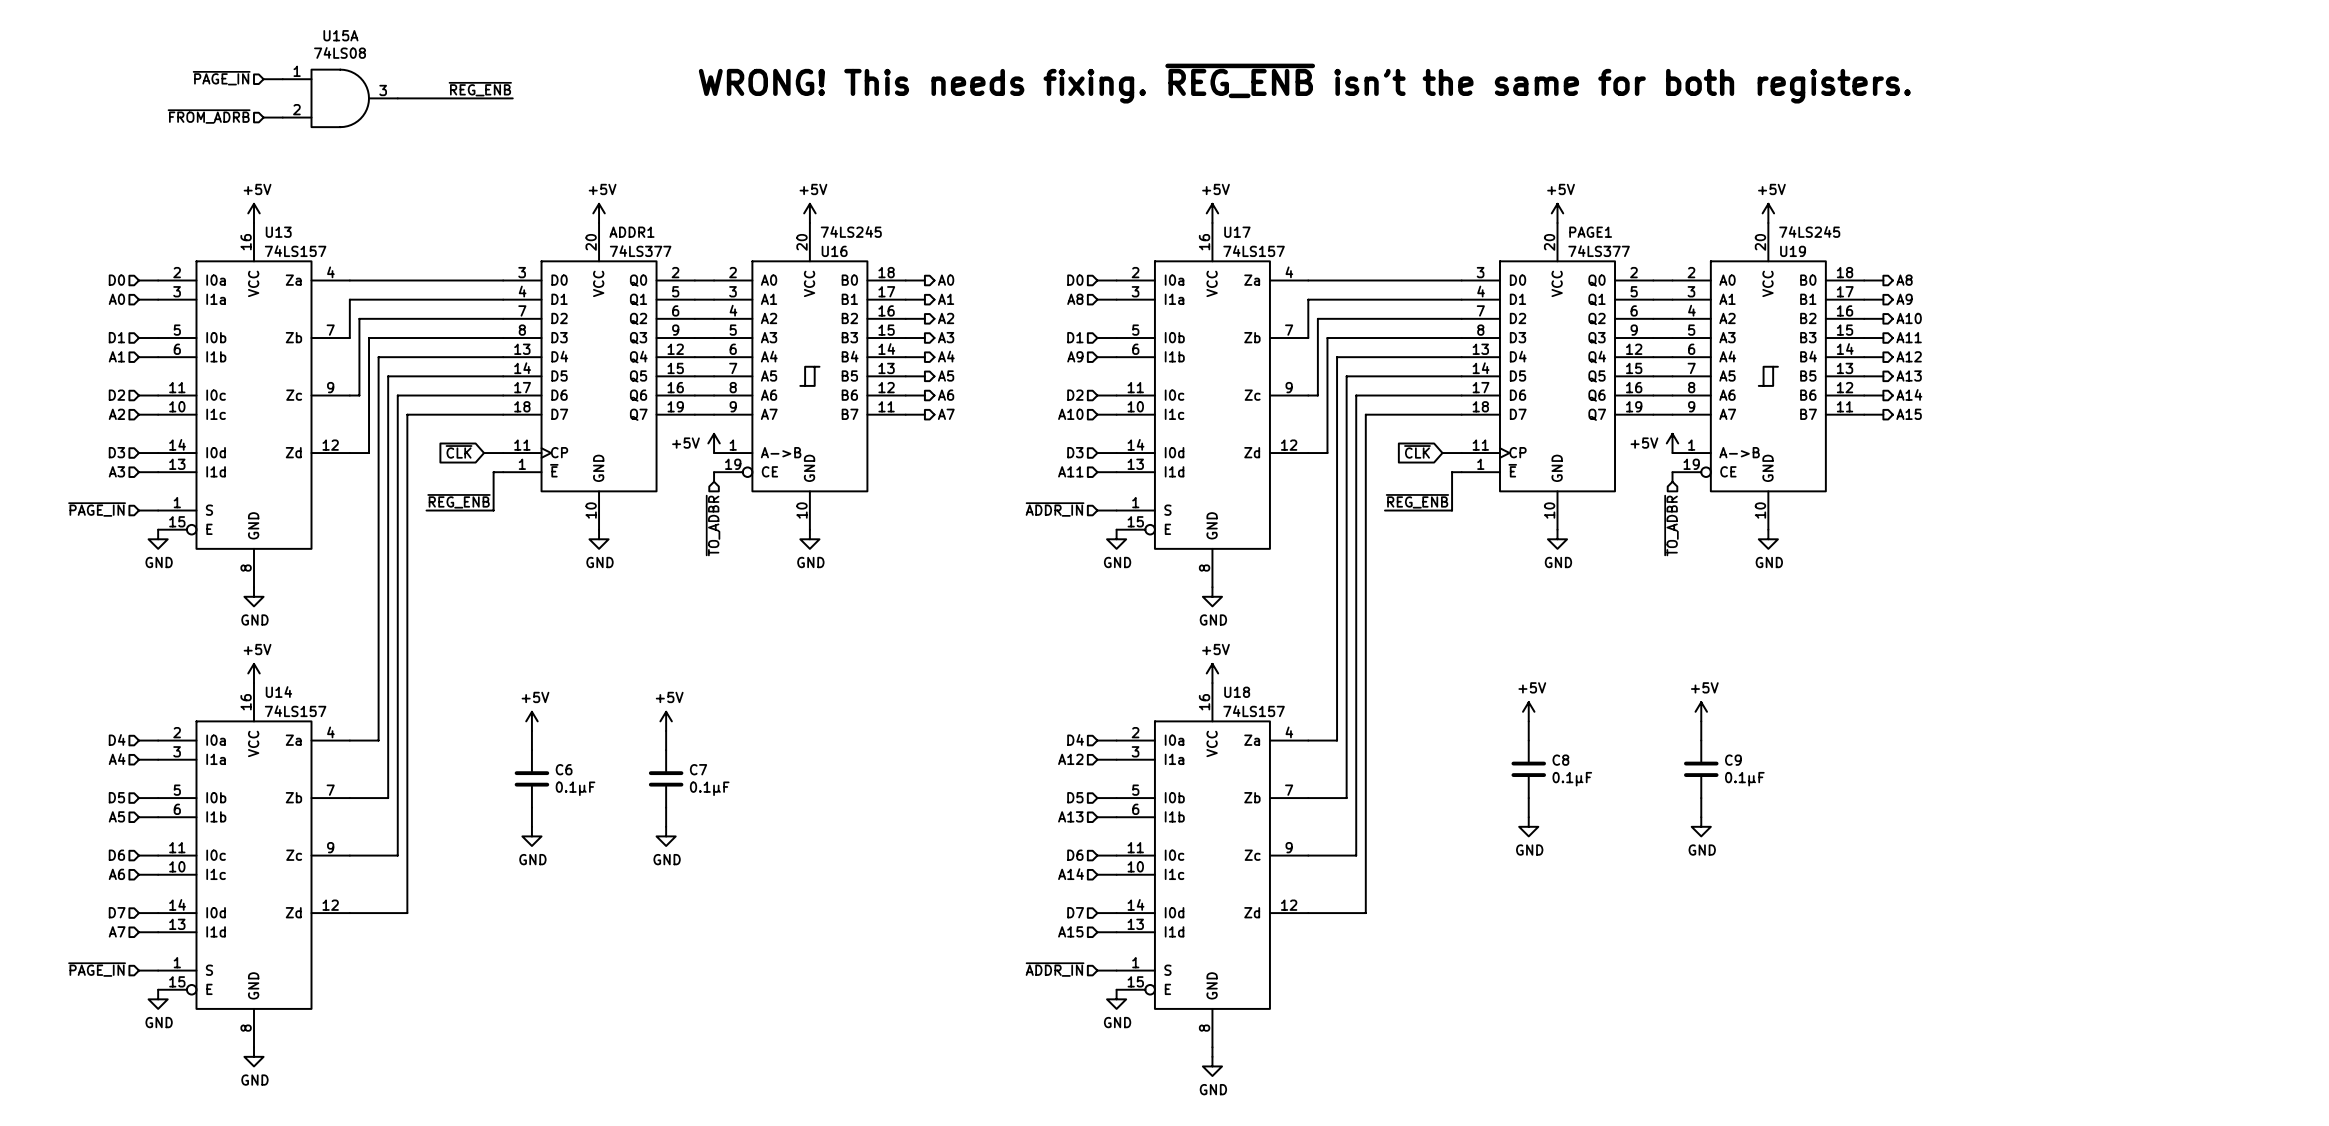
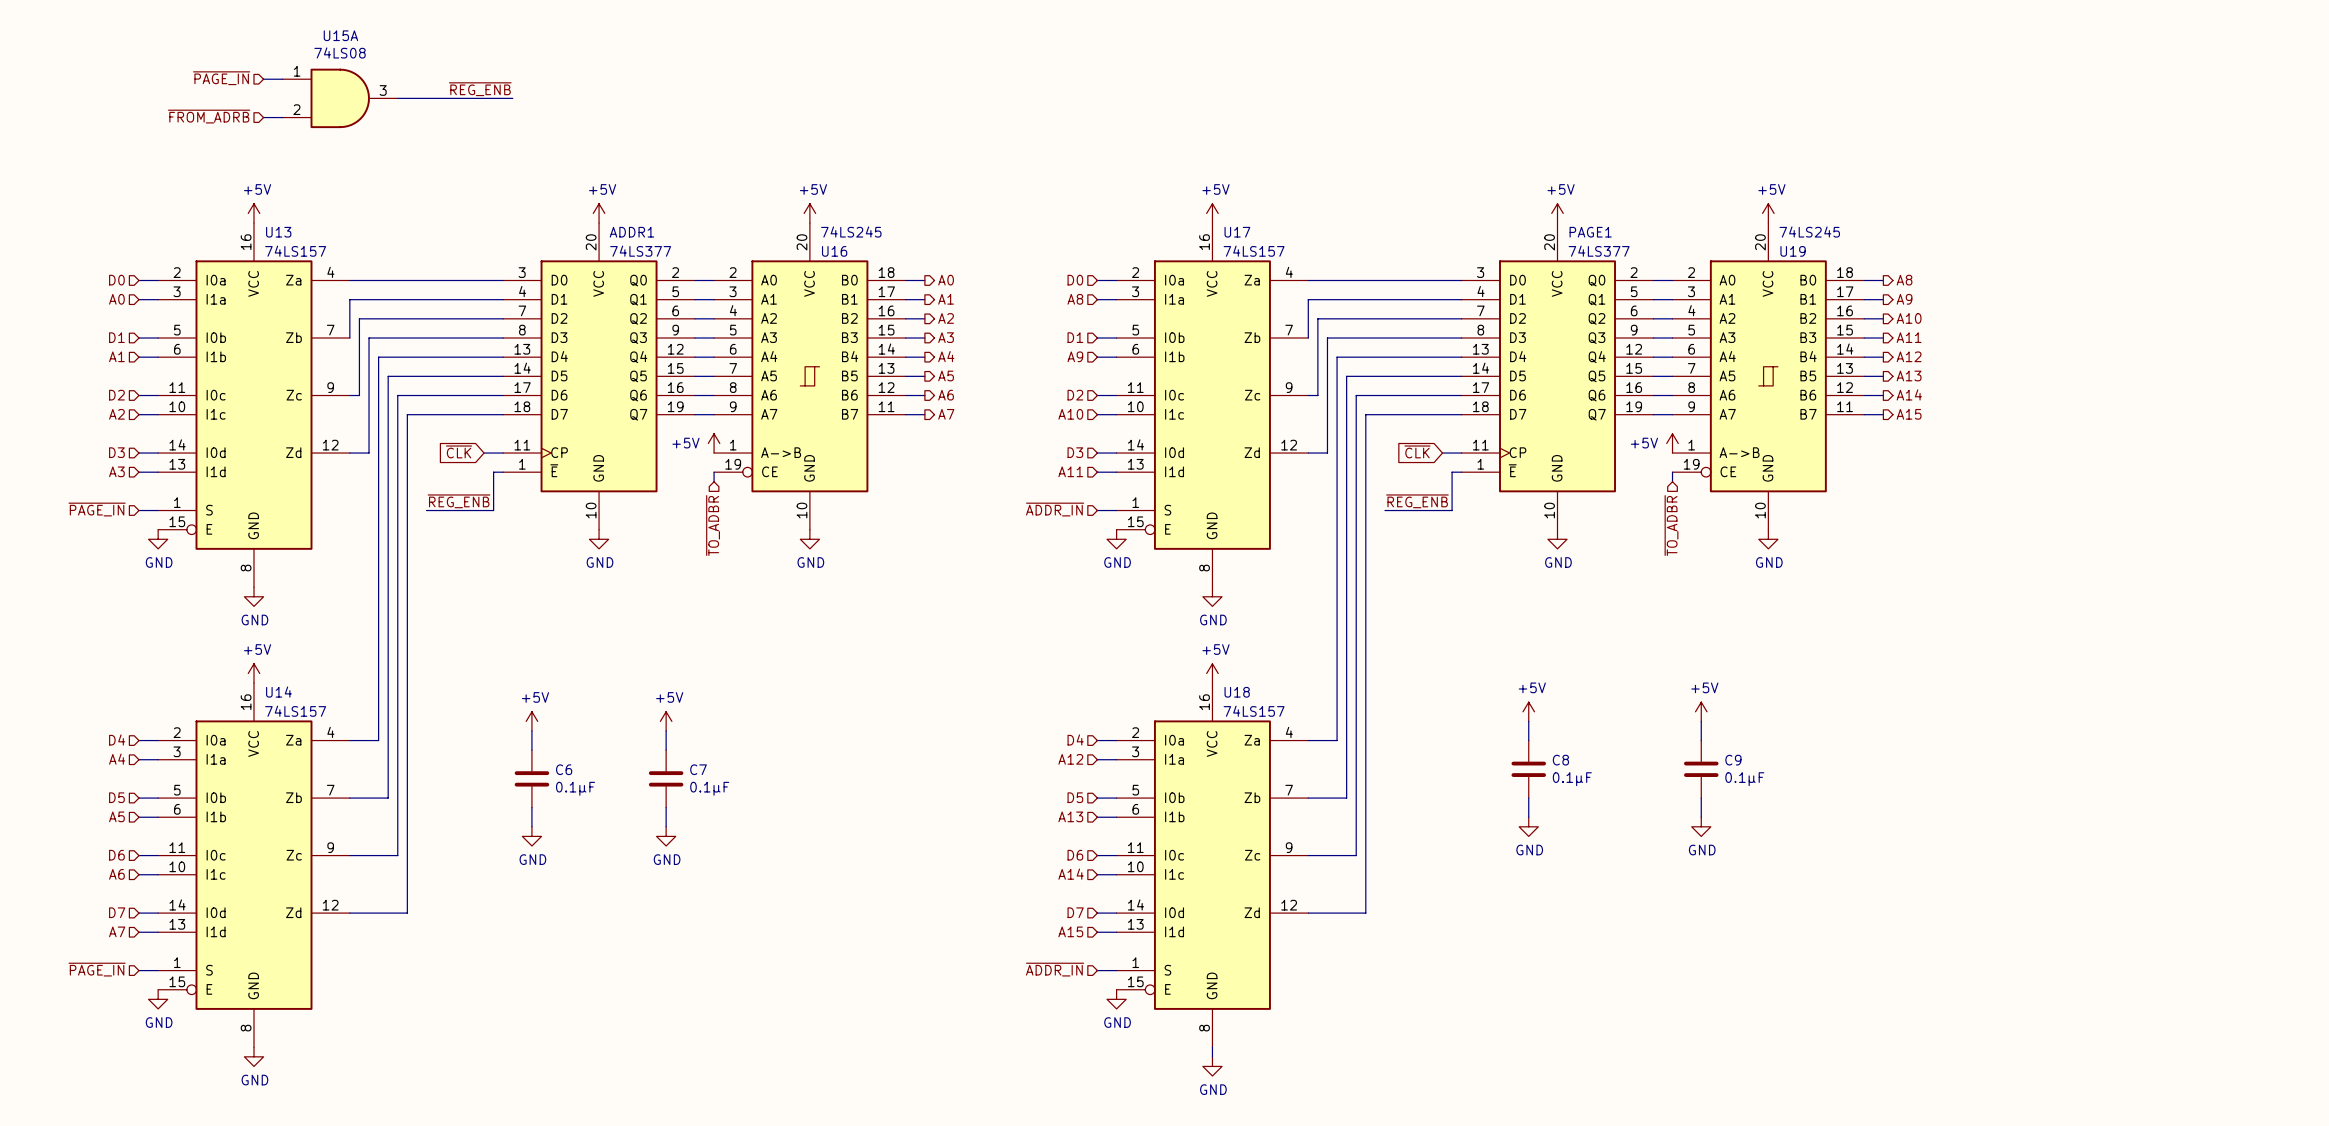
text: WRONG! This needs fixing. ~{REG_ENB} isn’t the same for both registers. (1304, 83) -> none

